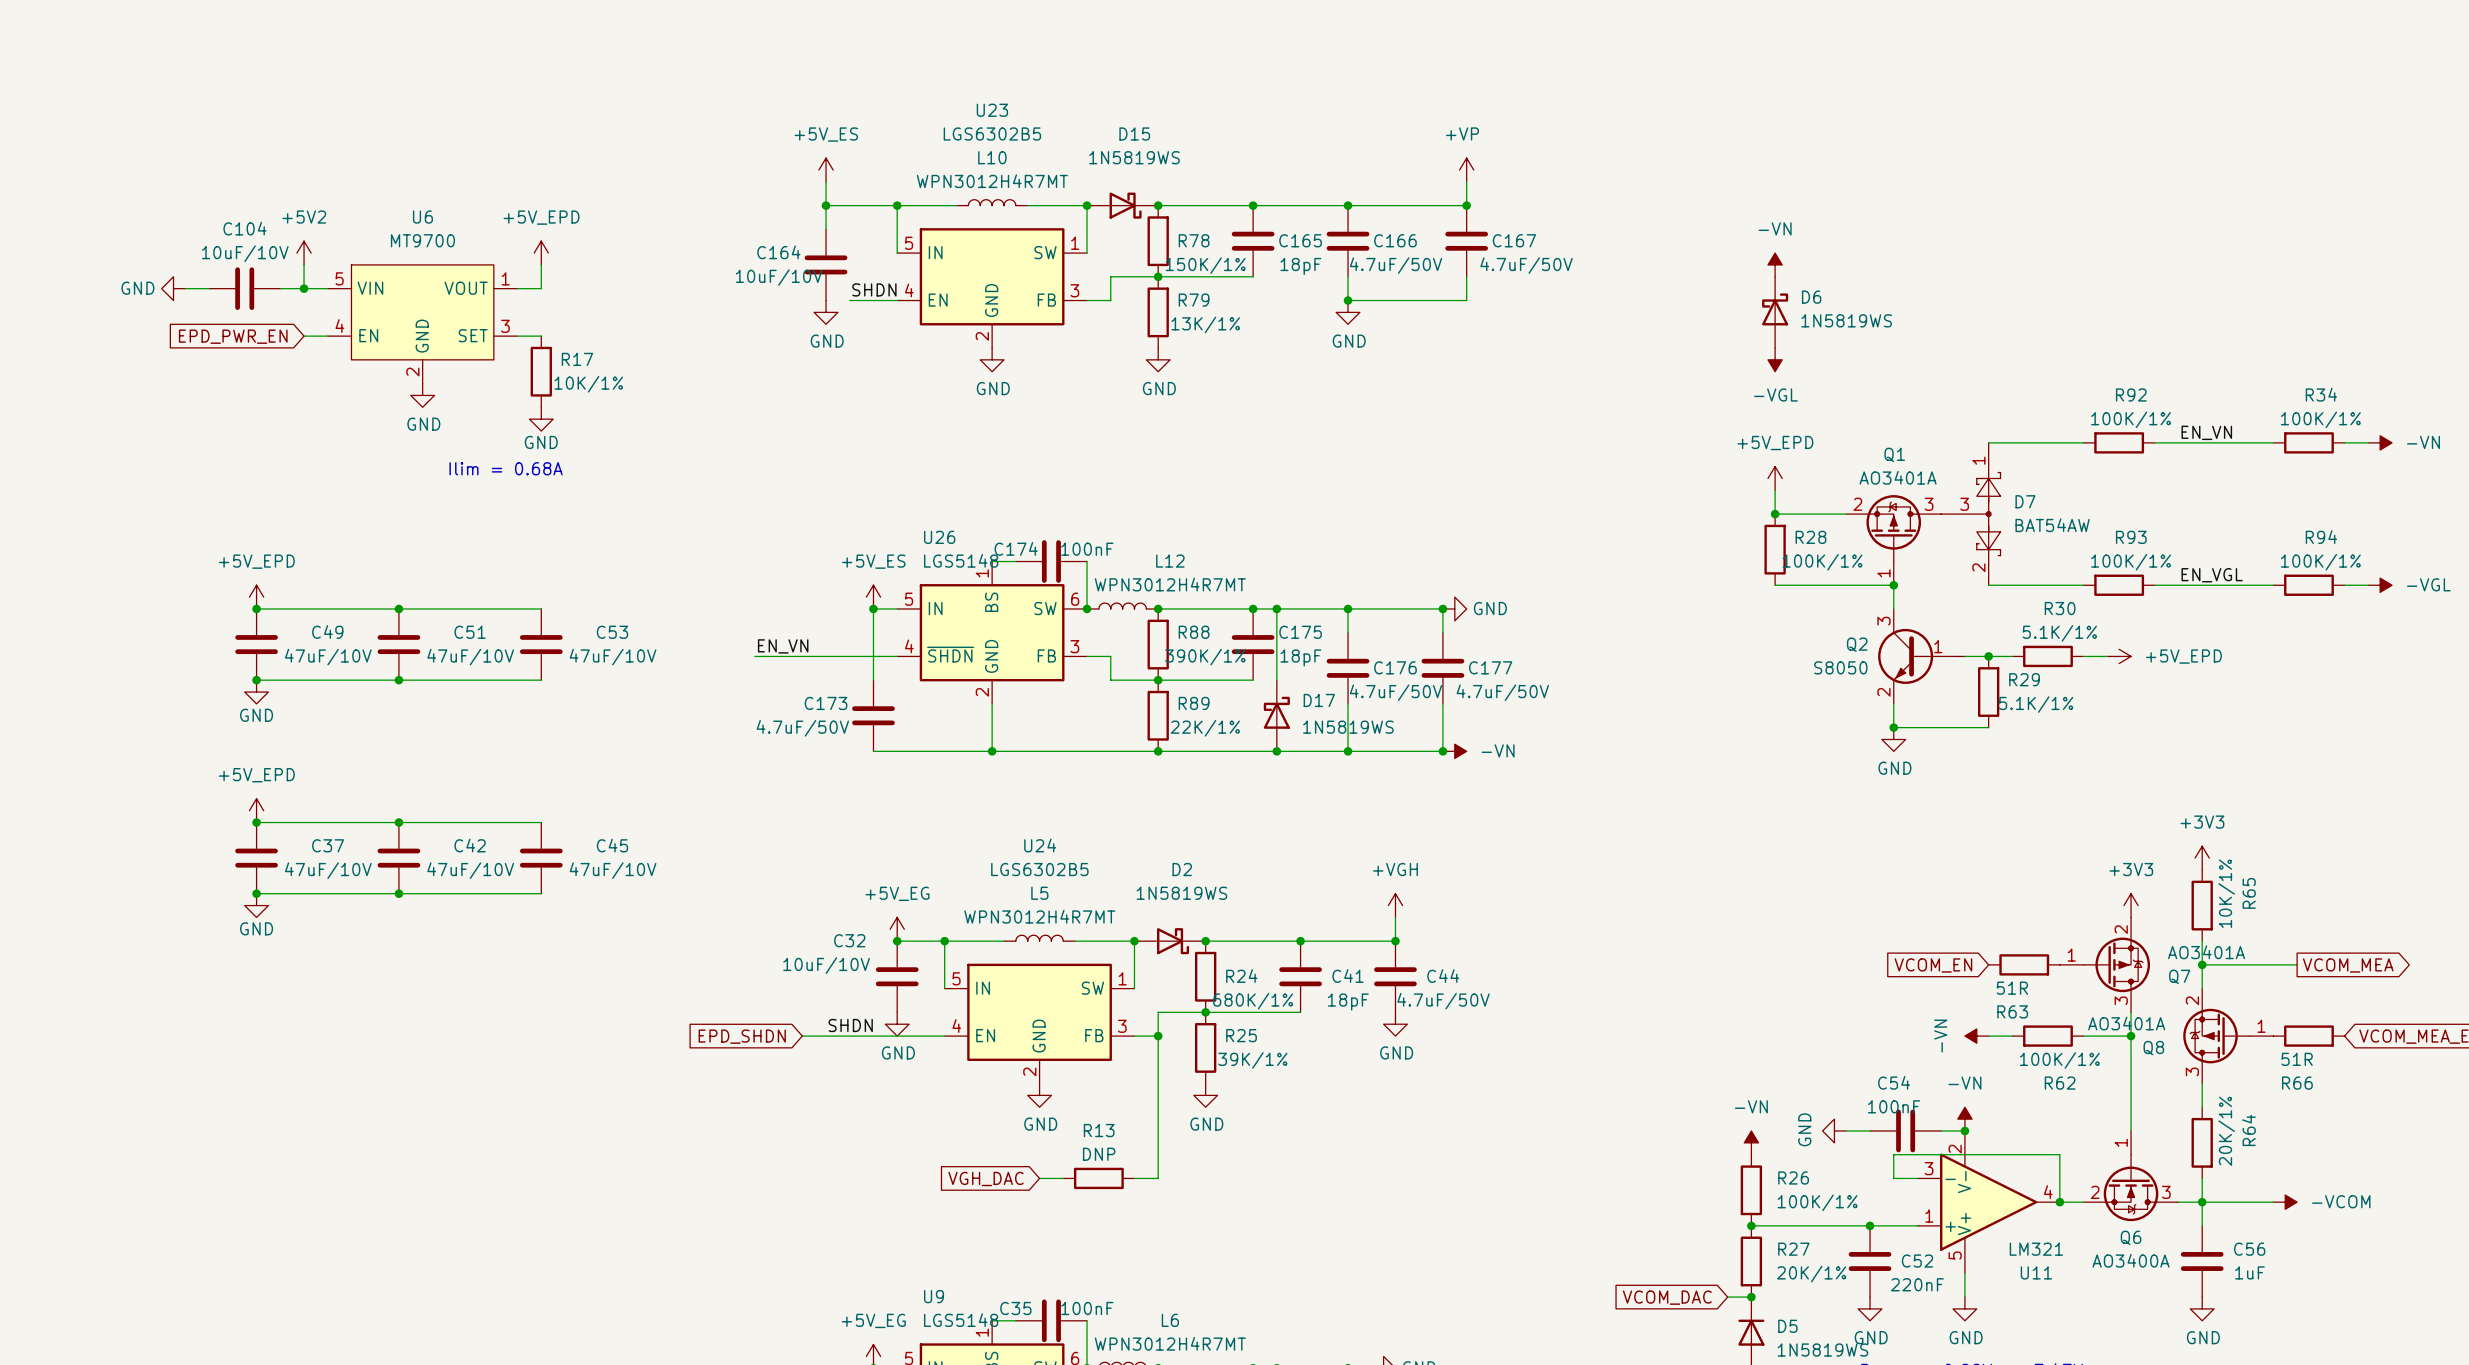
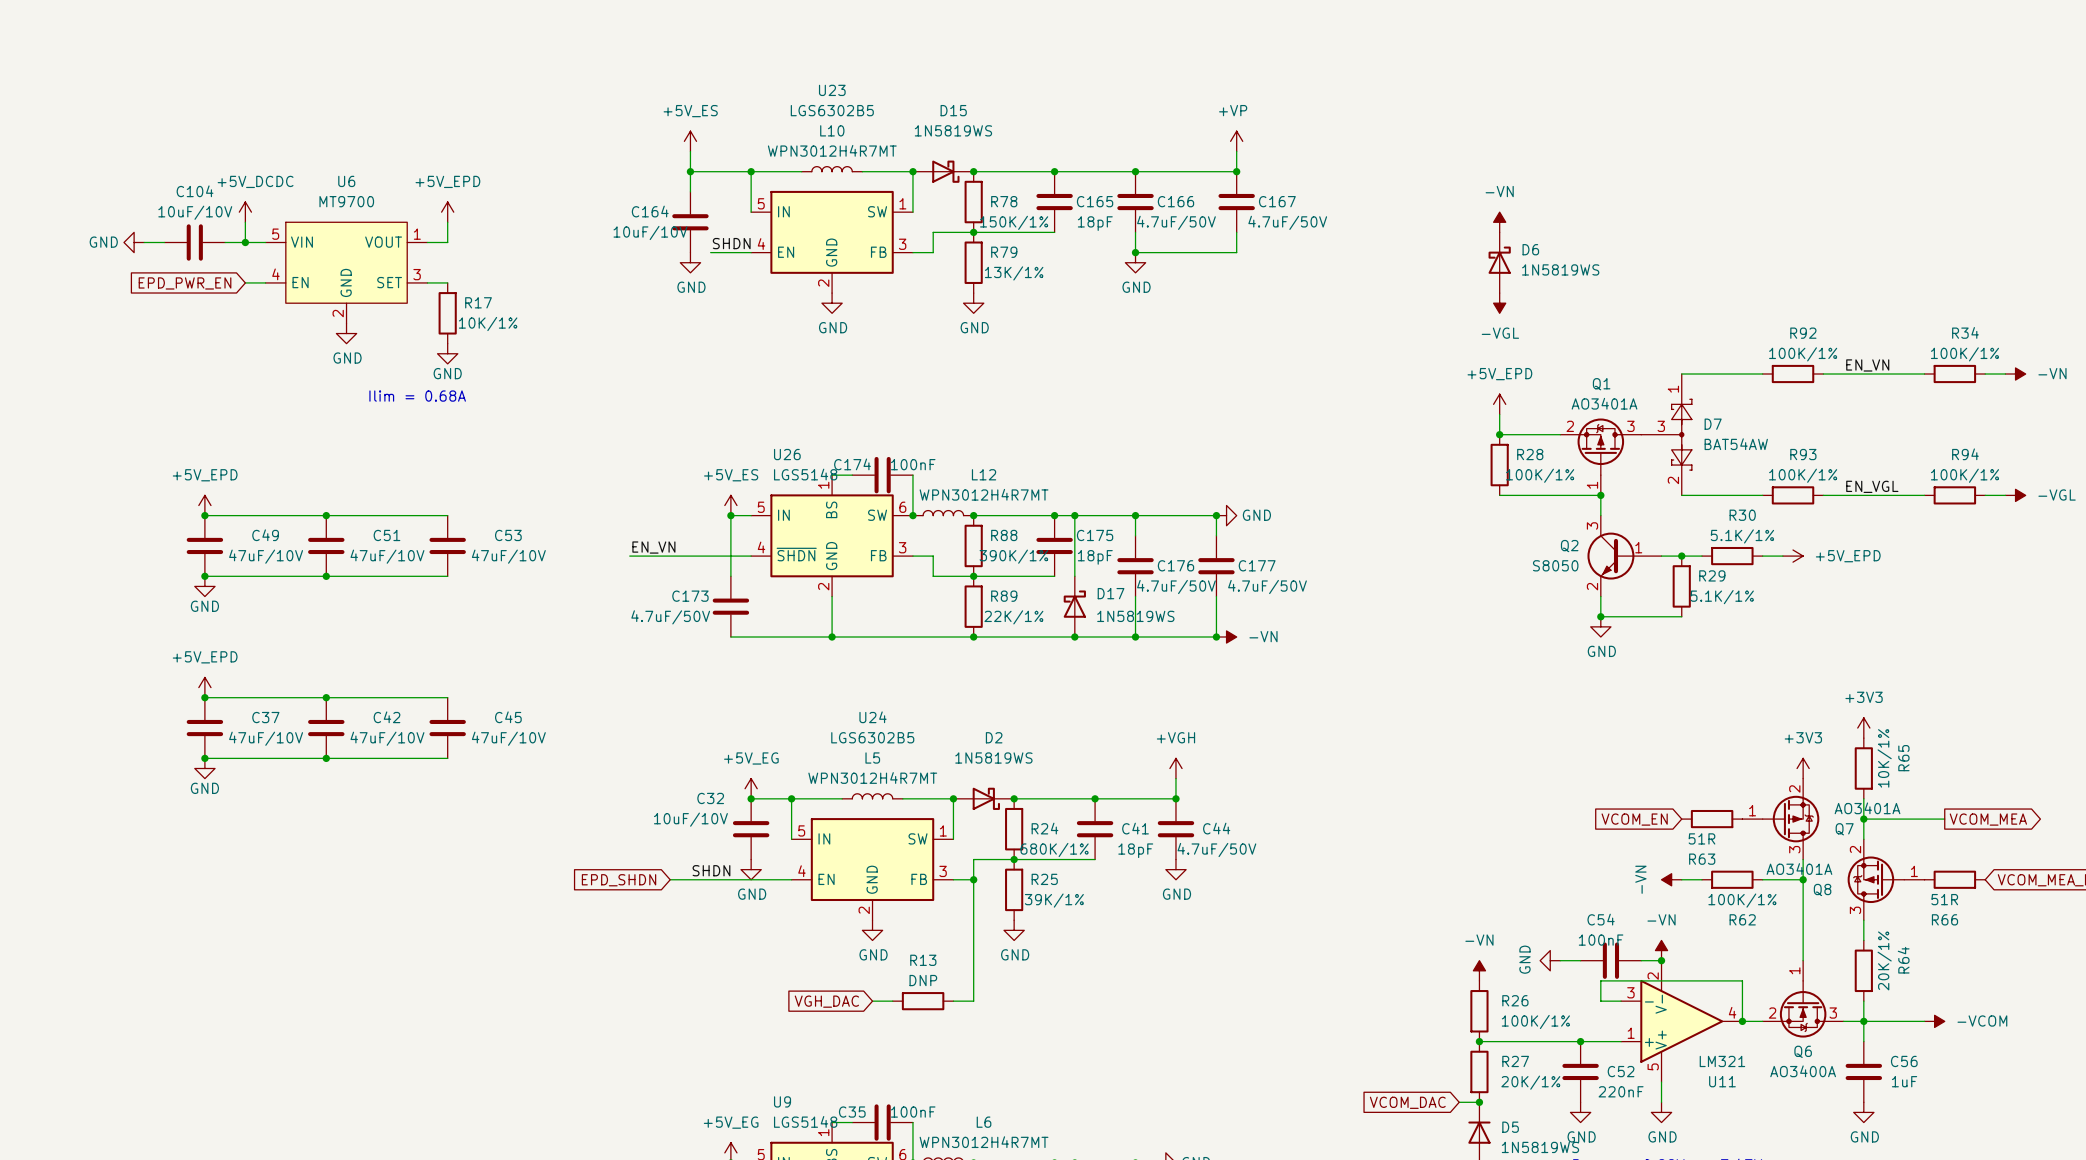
power symbol: +5V2 (304, 253) -> +5V_DCDC (245, 212)

